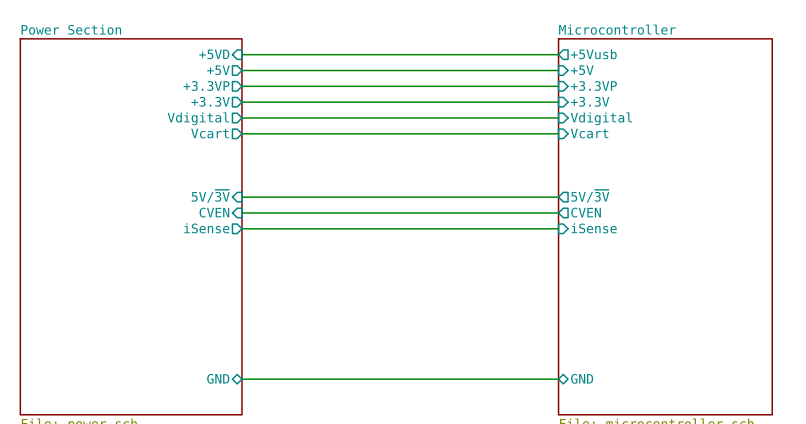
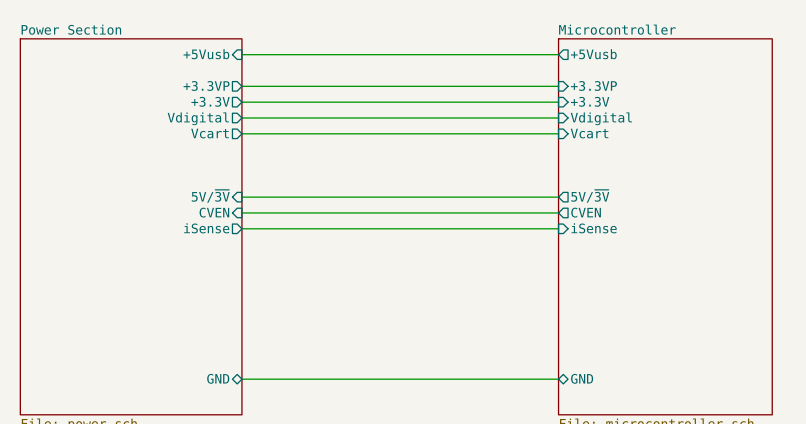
sheet pin: +5VD (214, 54) -> +5Vusb (206, 54)
sheet pin: +5V (218, 70) -> none
wire: (241, 70) (558, 70) -> none
sheet pin: +5V (582, 70) -> none

